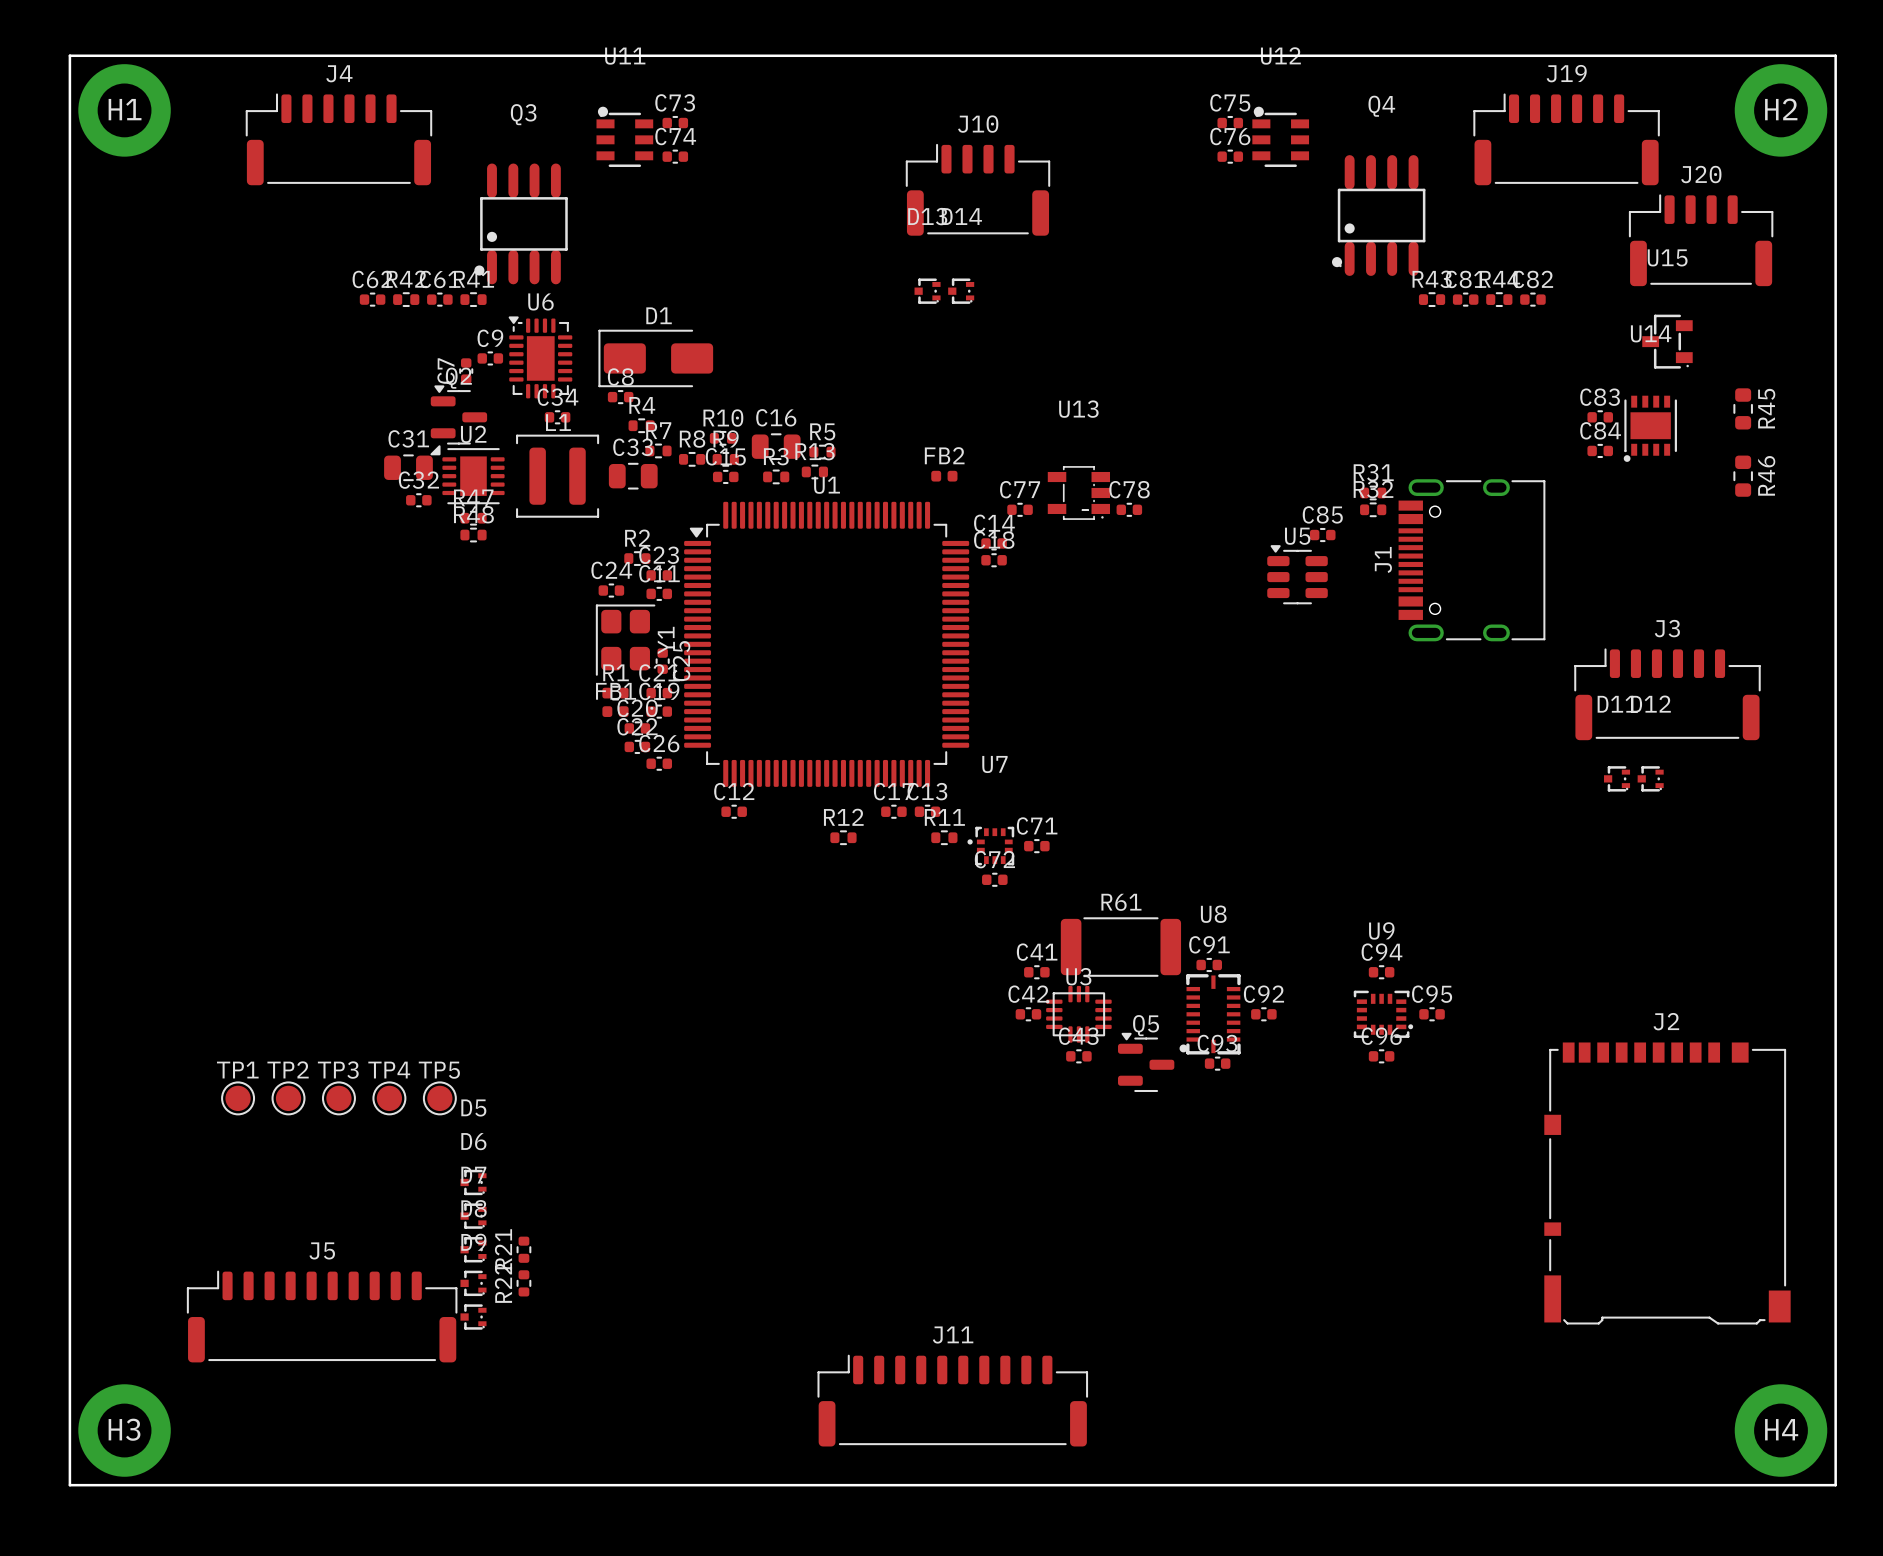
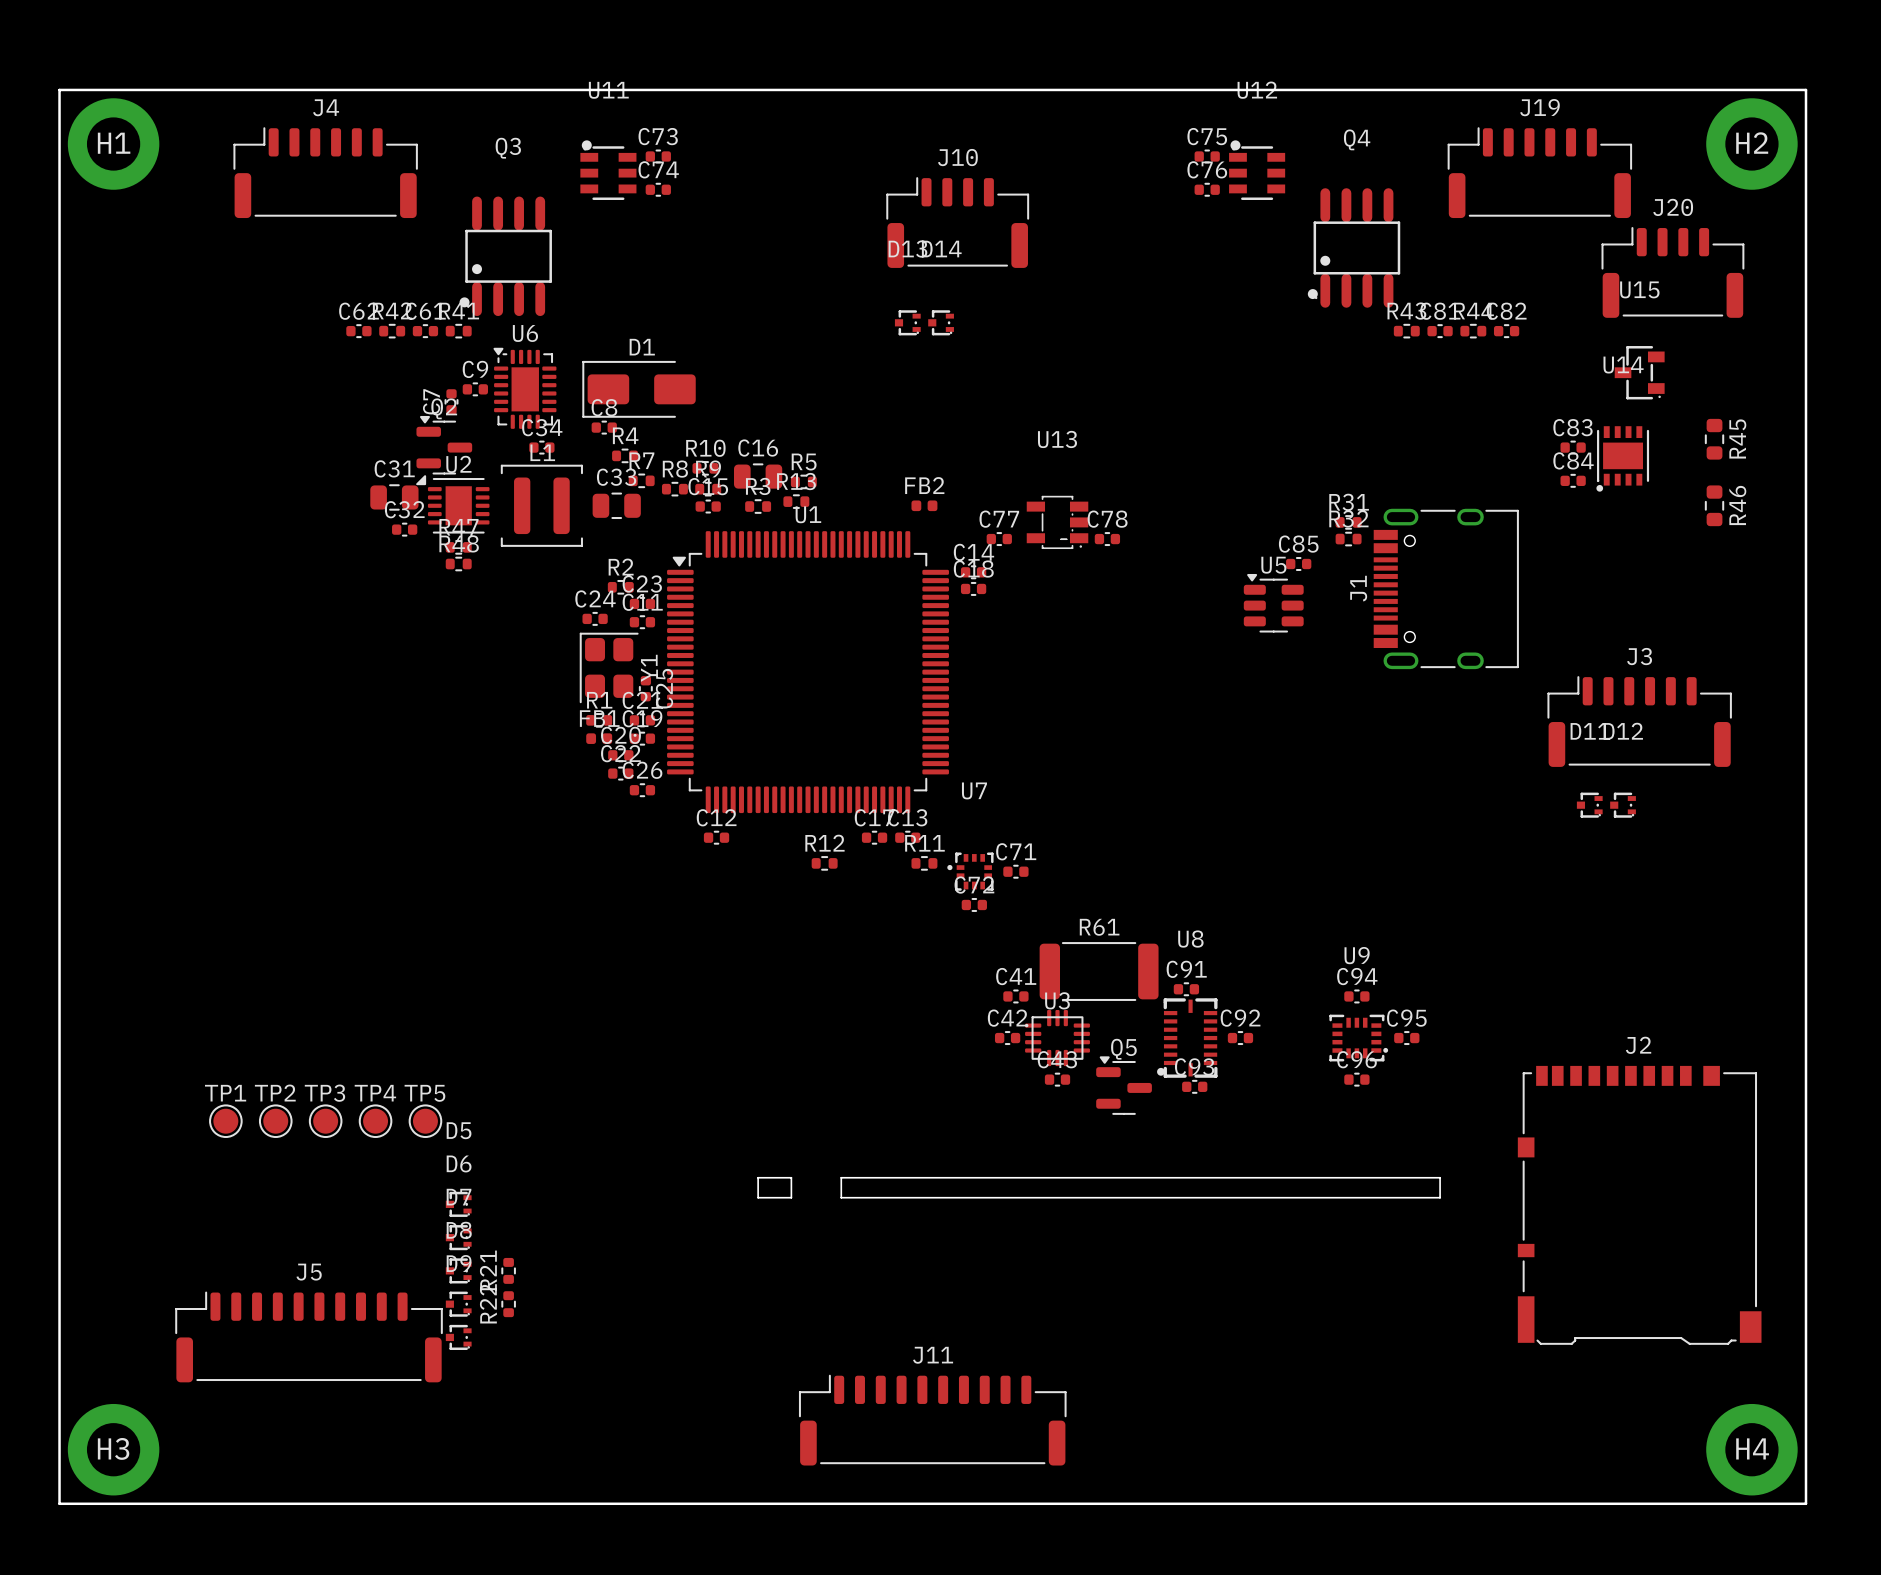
board edge: none -> (758, 1177) (791, 1177) (791, 1197) (758, 1197) (758, 1177)
board edge: none -> (841, 1177) (1440, 1177) (1440, 1197) (841, 1197) (841, 1177)

